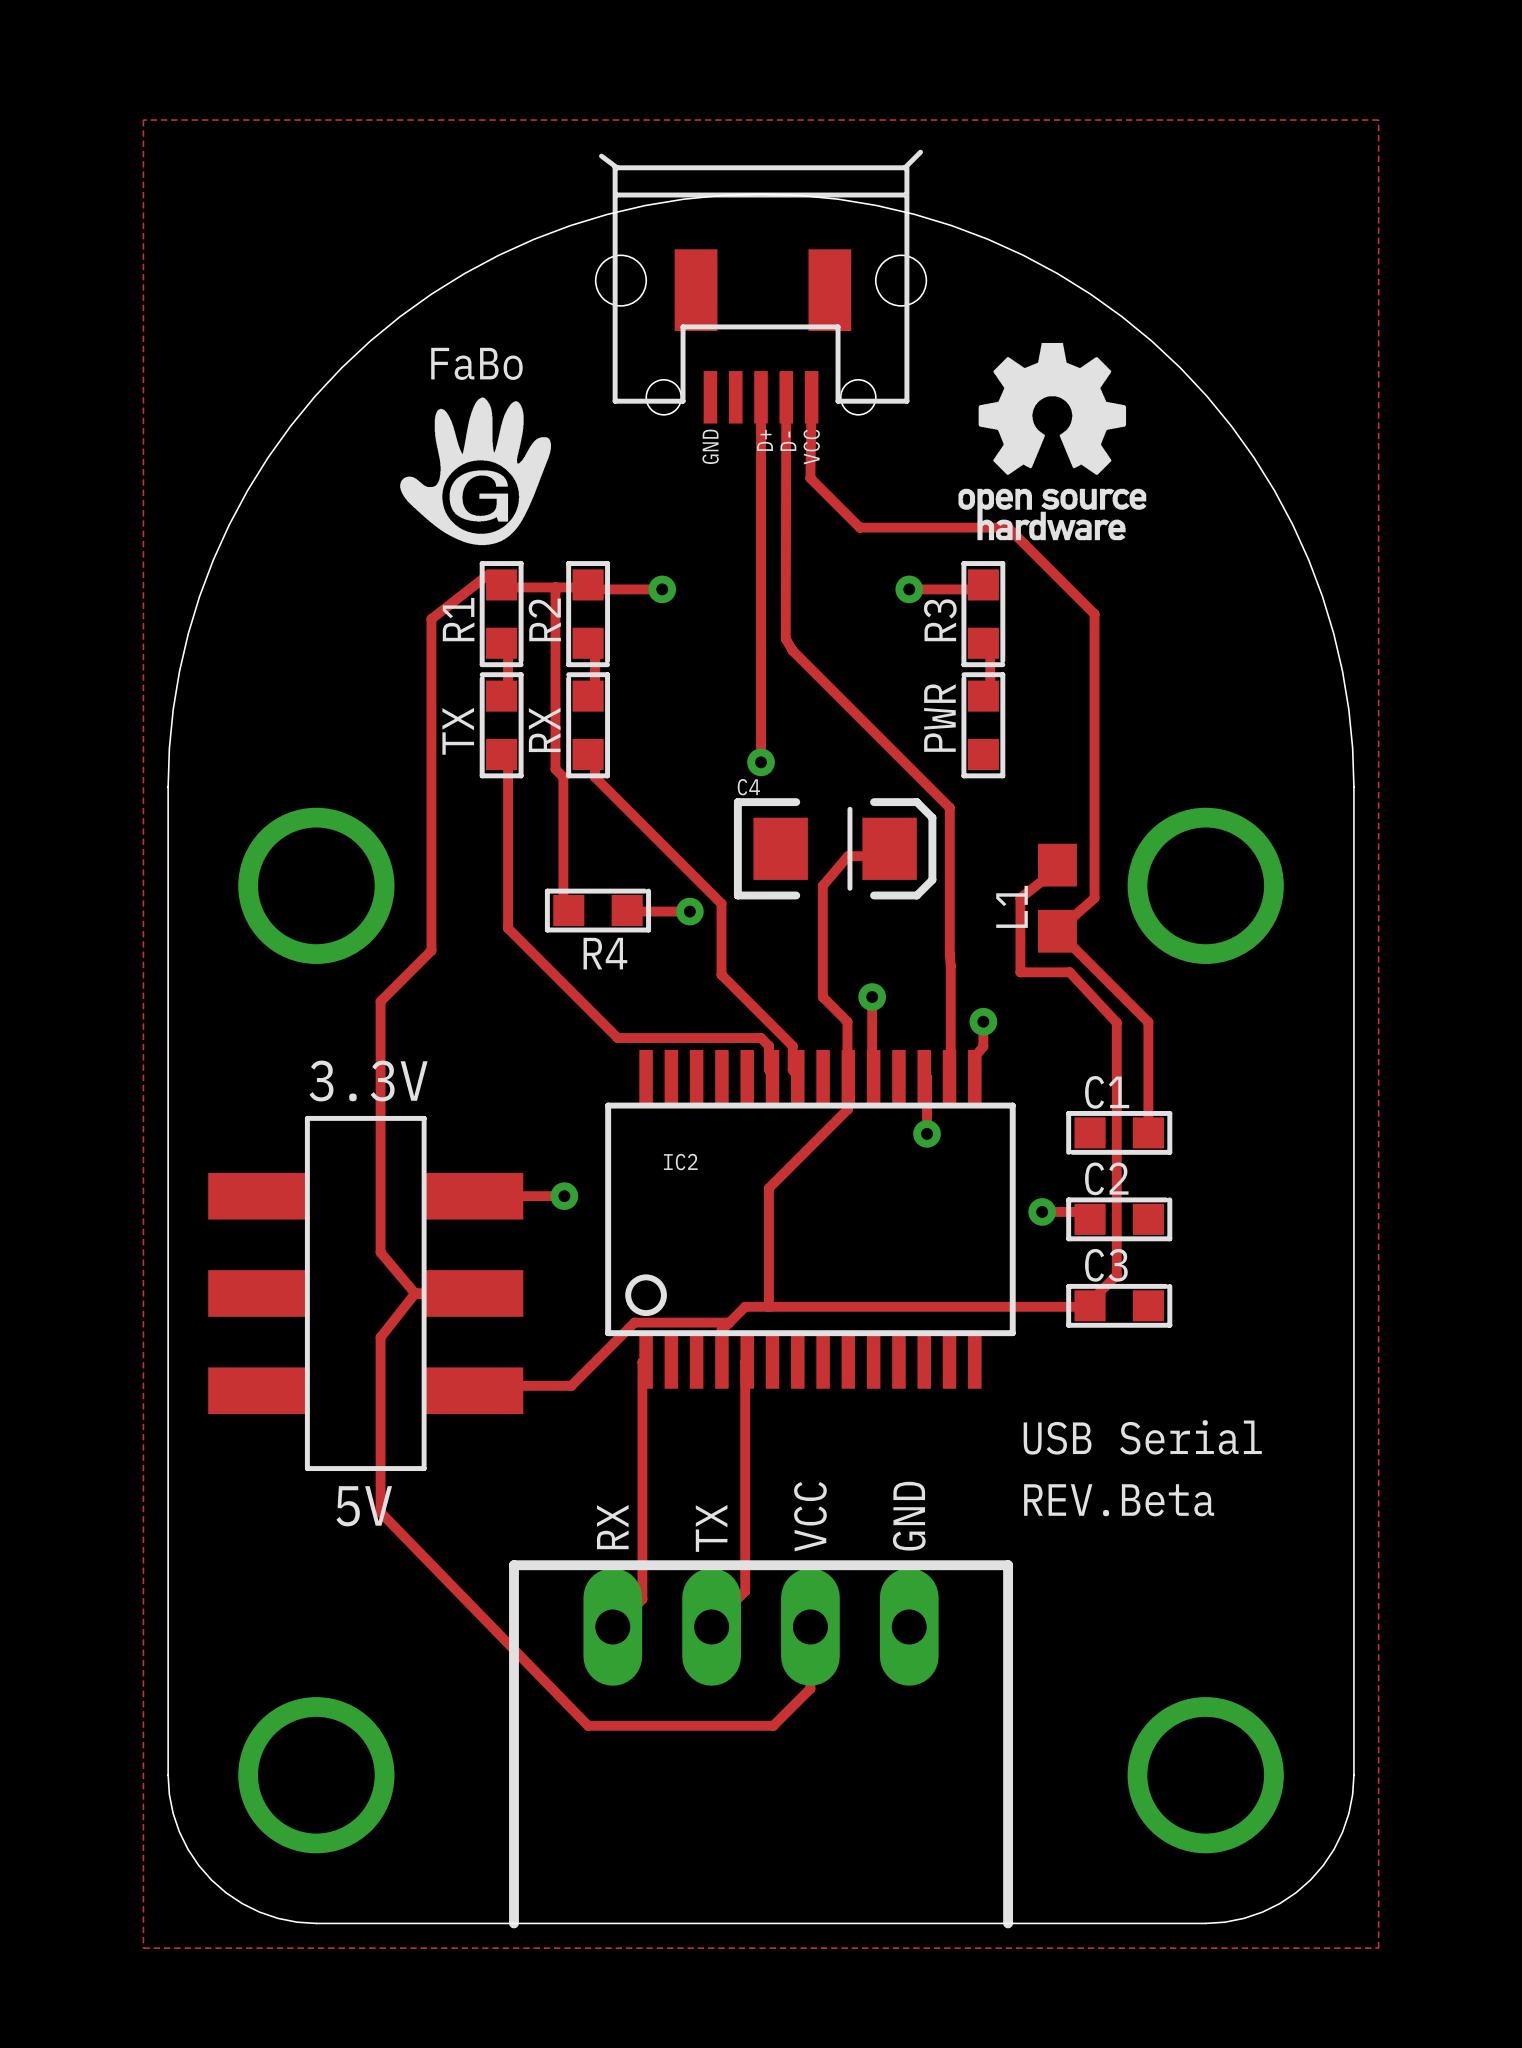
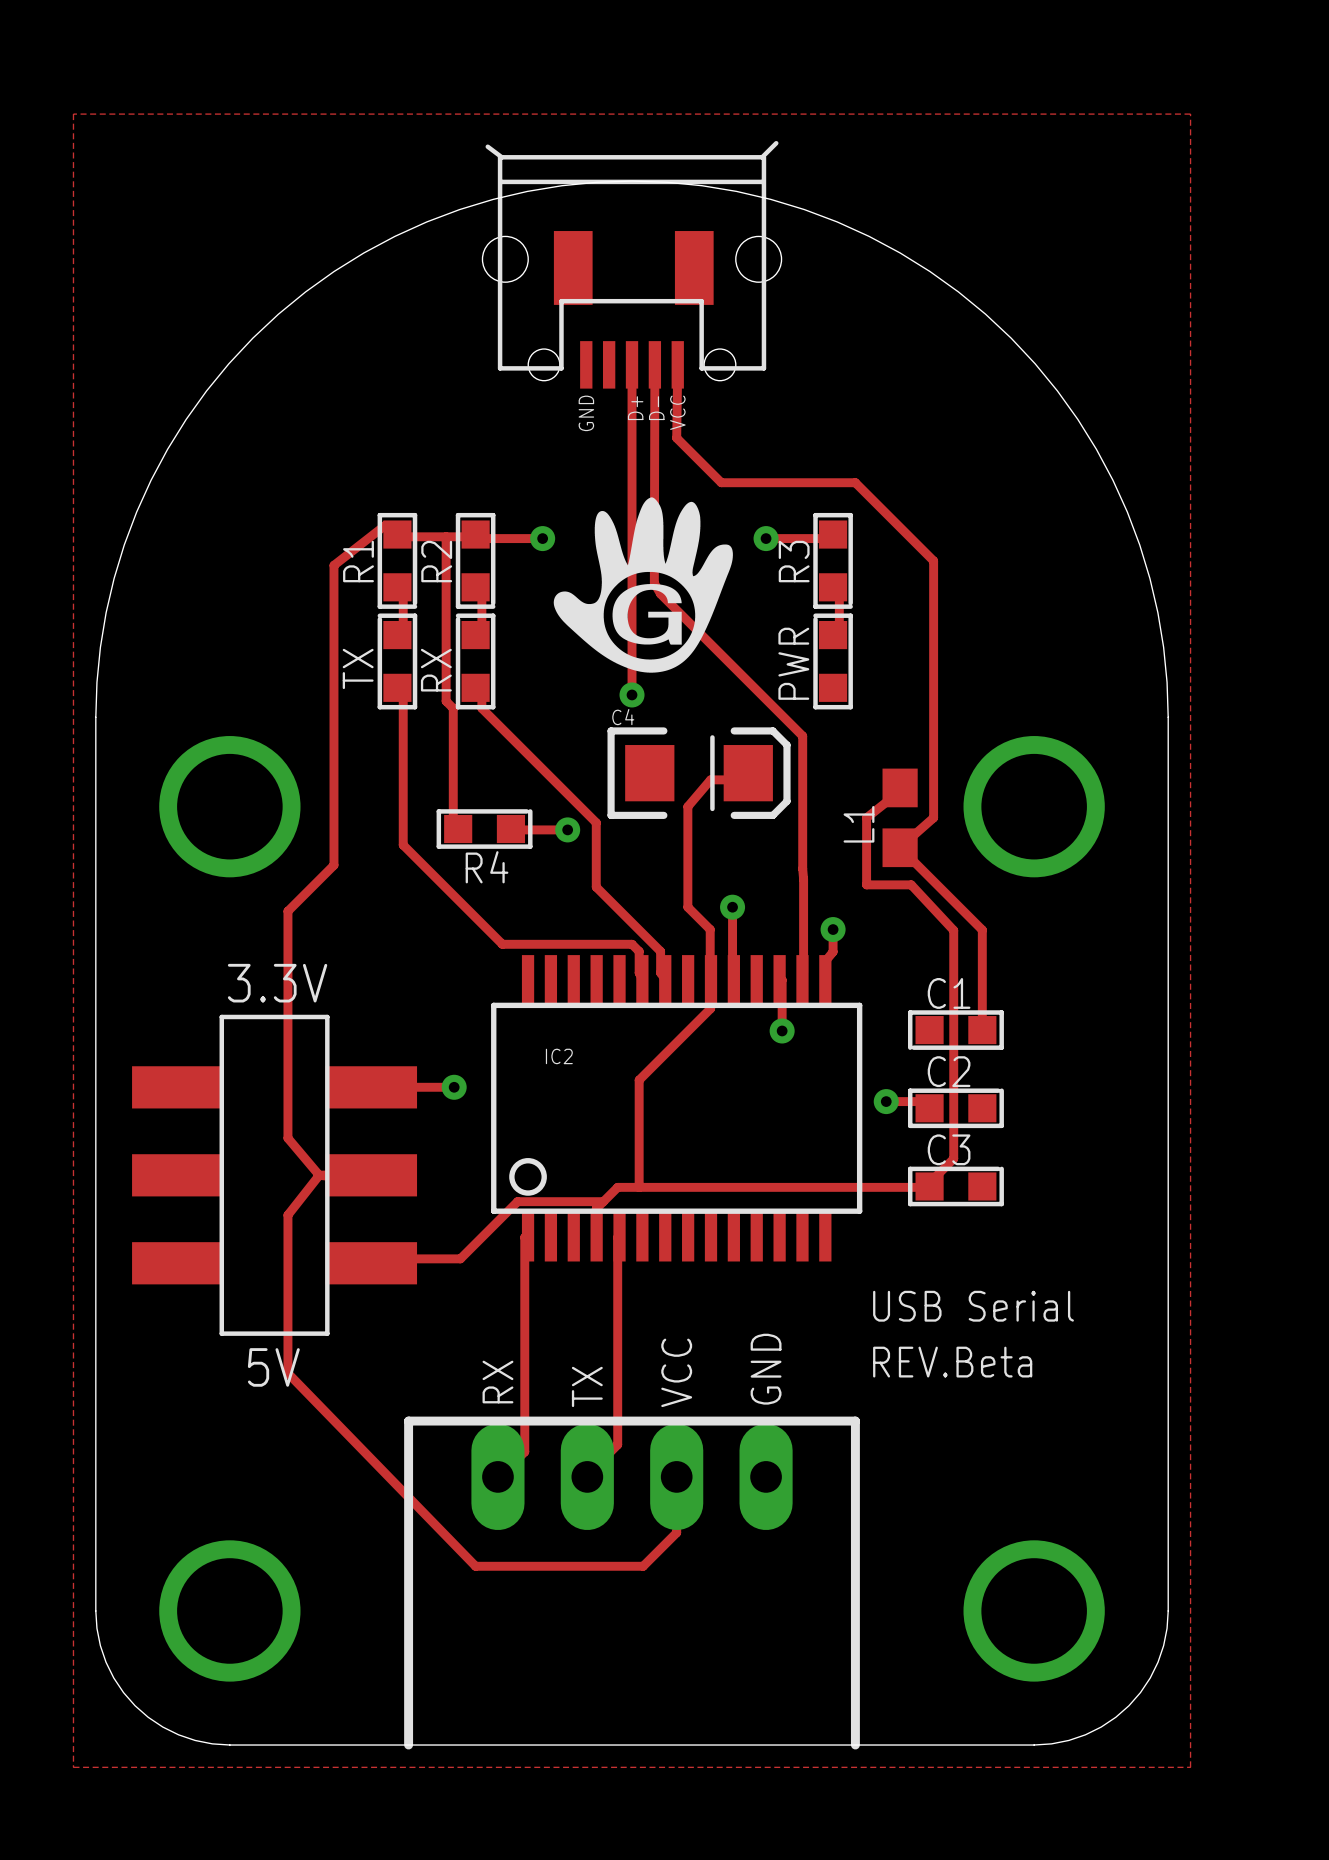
drawing: [958, 342, 1147, 541] -> none
text: FaBo (476, 363) -> none
drawing: [400, 397, 551, 546] -> none
drawing: none -> [553, 497, 733, 673]

